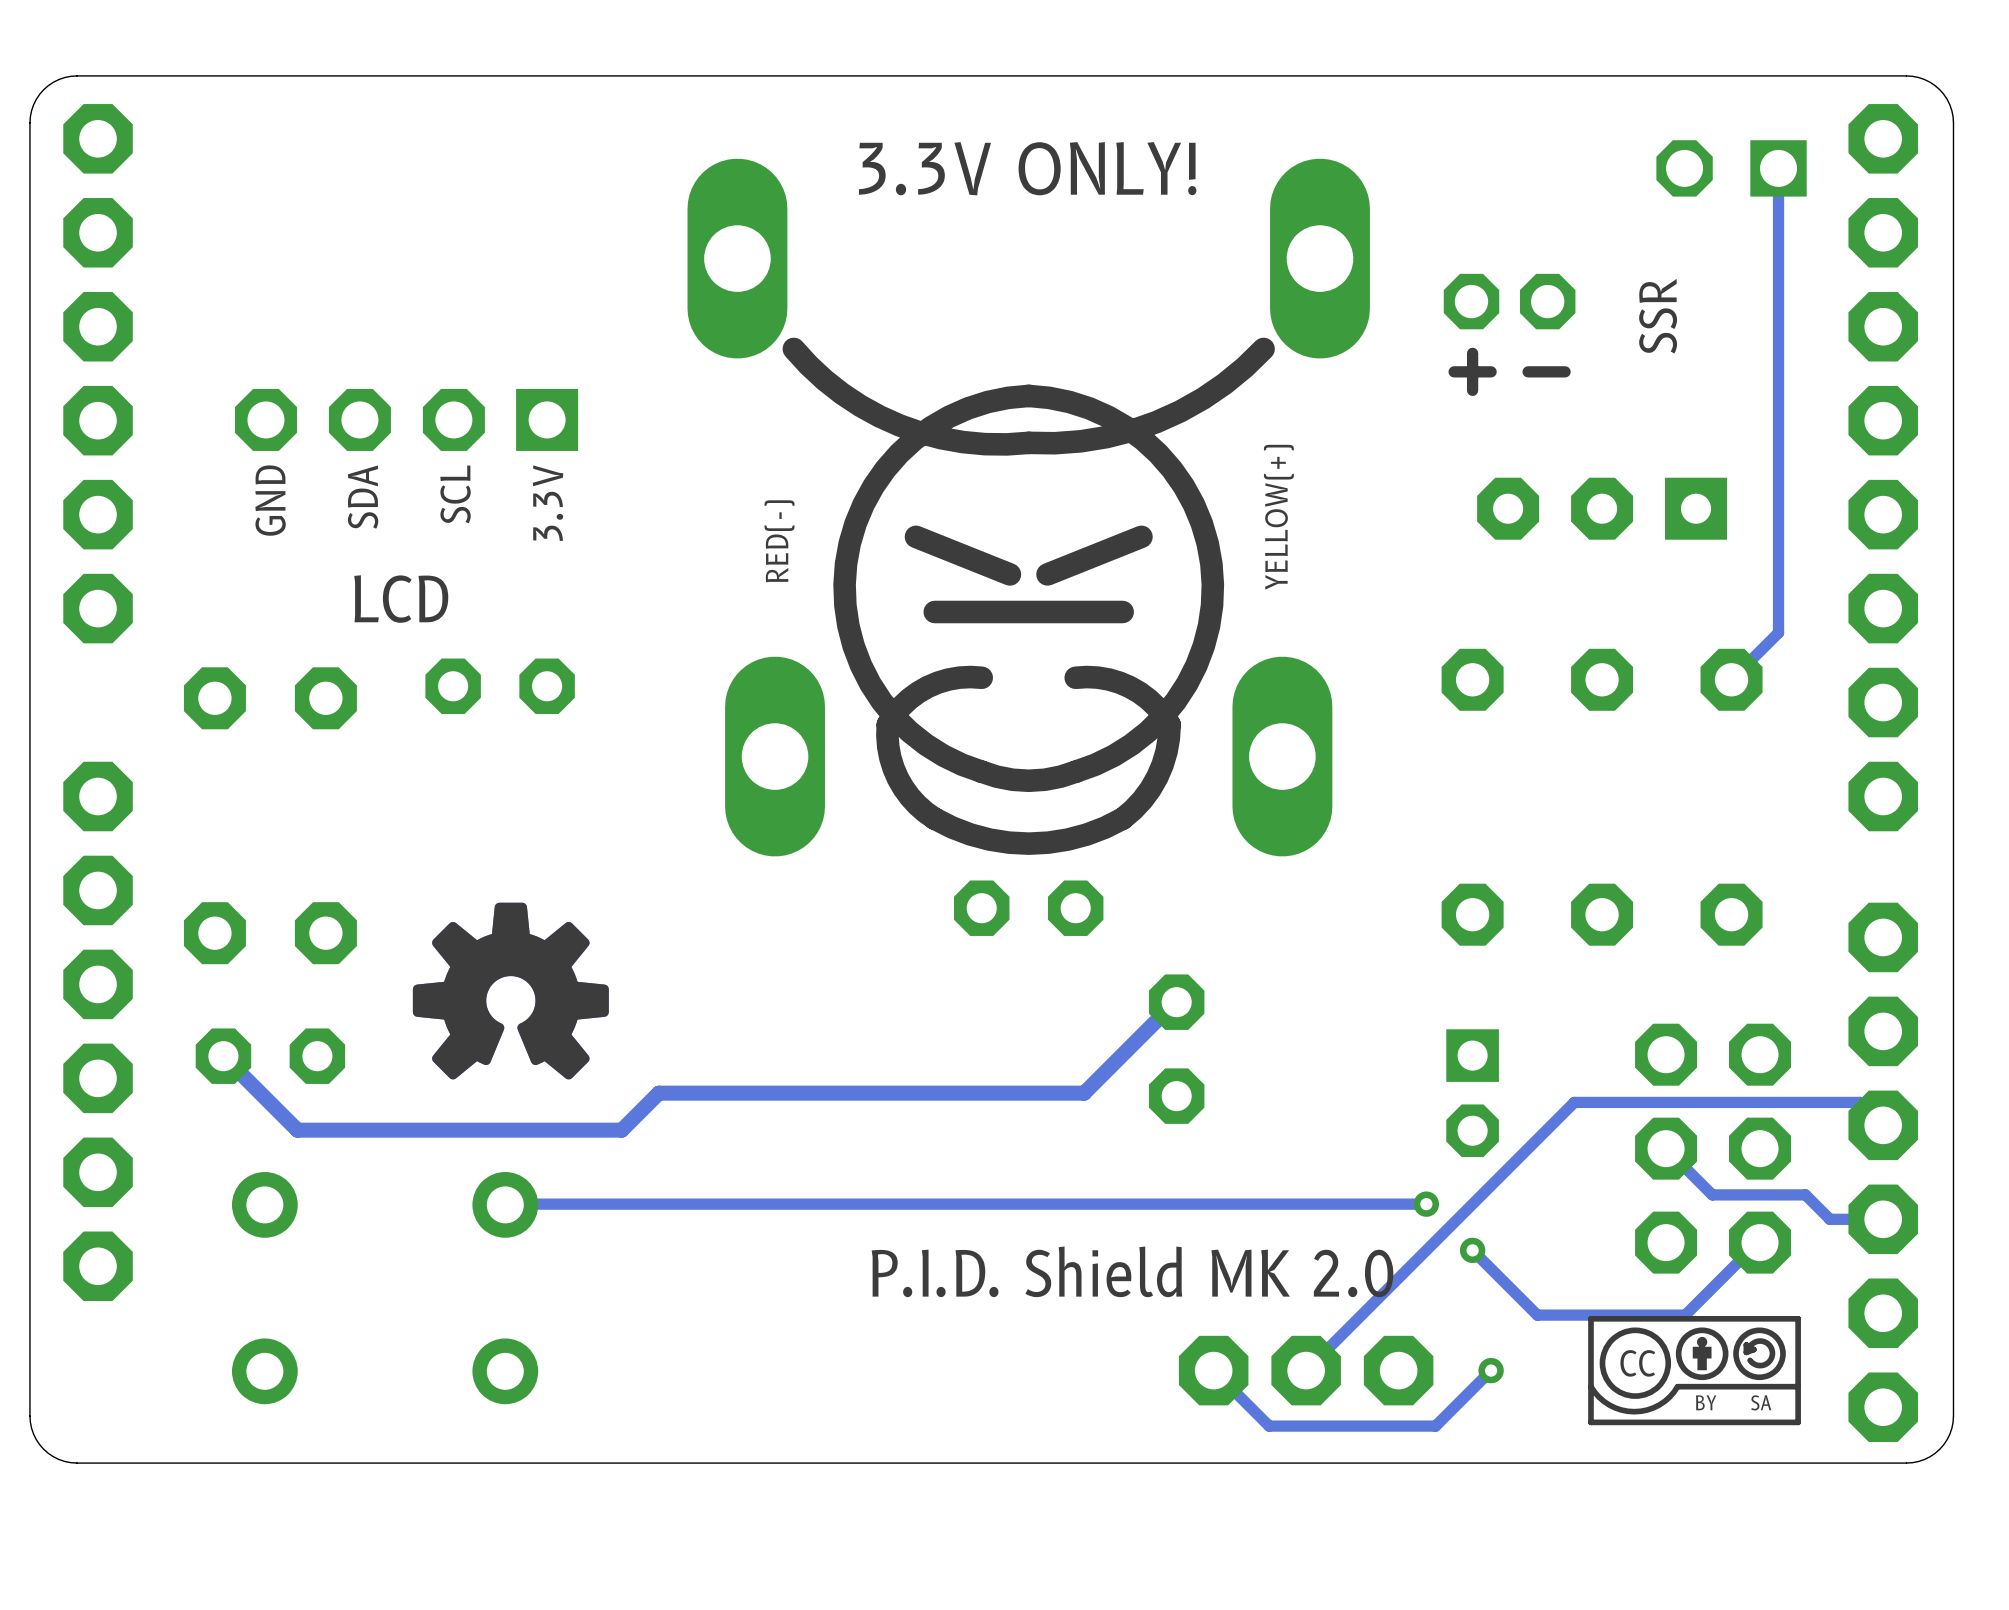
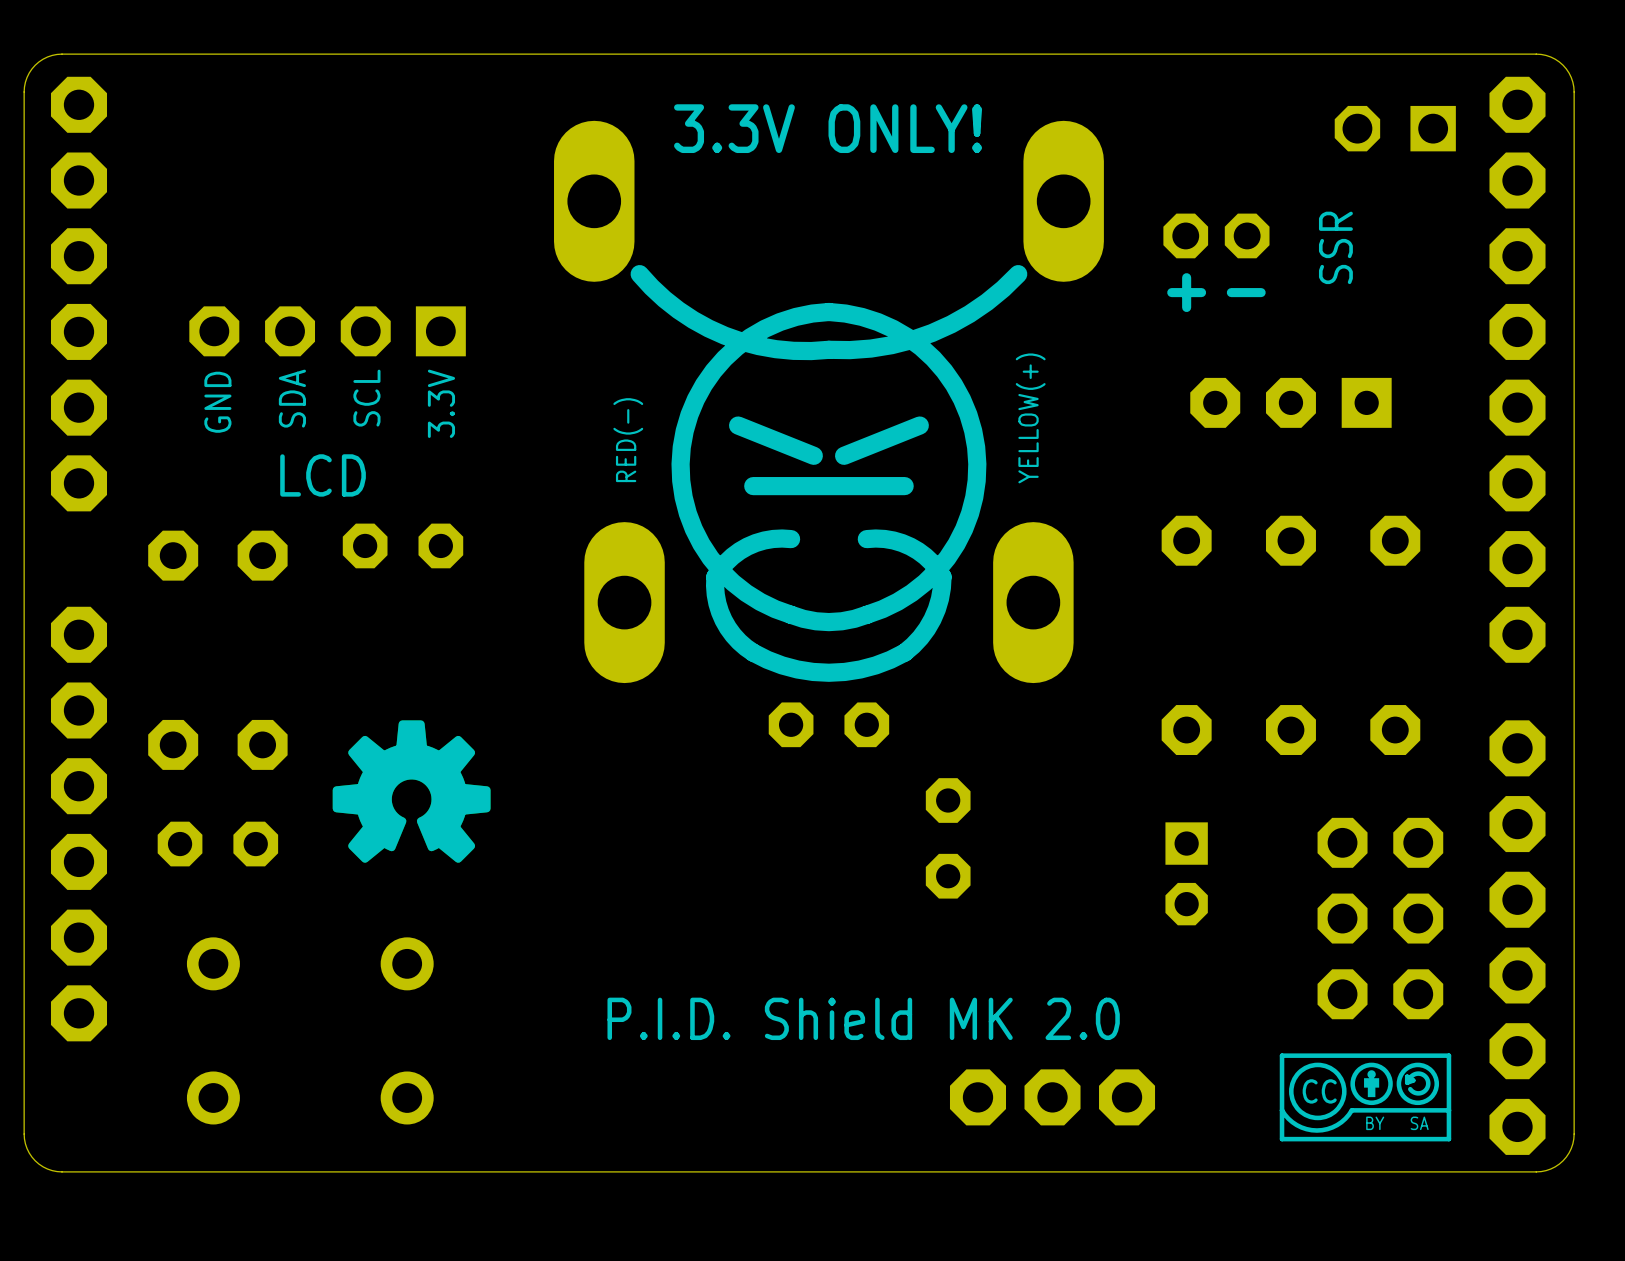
track: (1778, 168) (1778, 632) (1731, 679) -> none
track: (1176, 1002) (1084, 1093) (658, 1093) (621, 1130) (297, 1130) (223, 1056) -> none
track: (1883, 1125) (1860, 1102) (1574, 1102) (1306, 1370) -> none
track: (1666, 1148) (1712, 1194) (1805, 1194) (1829, 1219) (1883, 1219) -> none
track: (1426, 1204) (505, 1204) -> none
via: (1426, 1204) -> none
track: (1760, 1242) (1757, 1242) (1685, 1315) (1537, 1315) (1472, 1250) -> none
via: (1472, 1250) -> none
track: (1491, 1370) (1435, 1426) (1269, 1426) (1213, 1370) -> none
via: (1491, 1370) -> none

